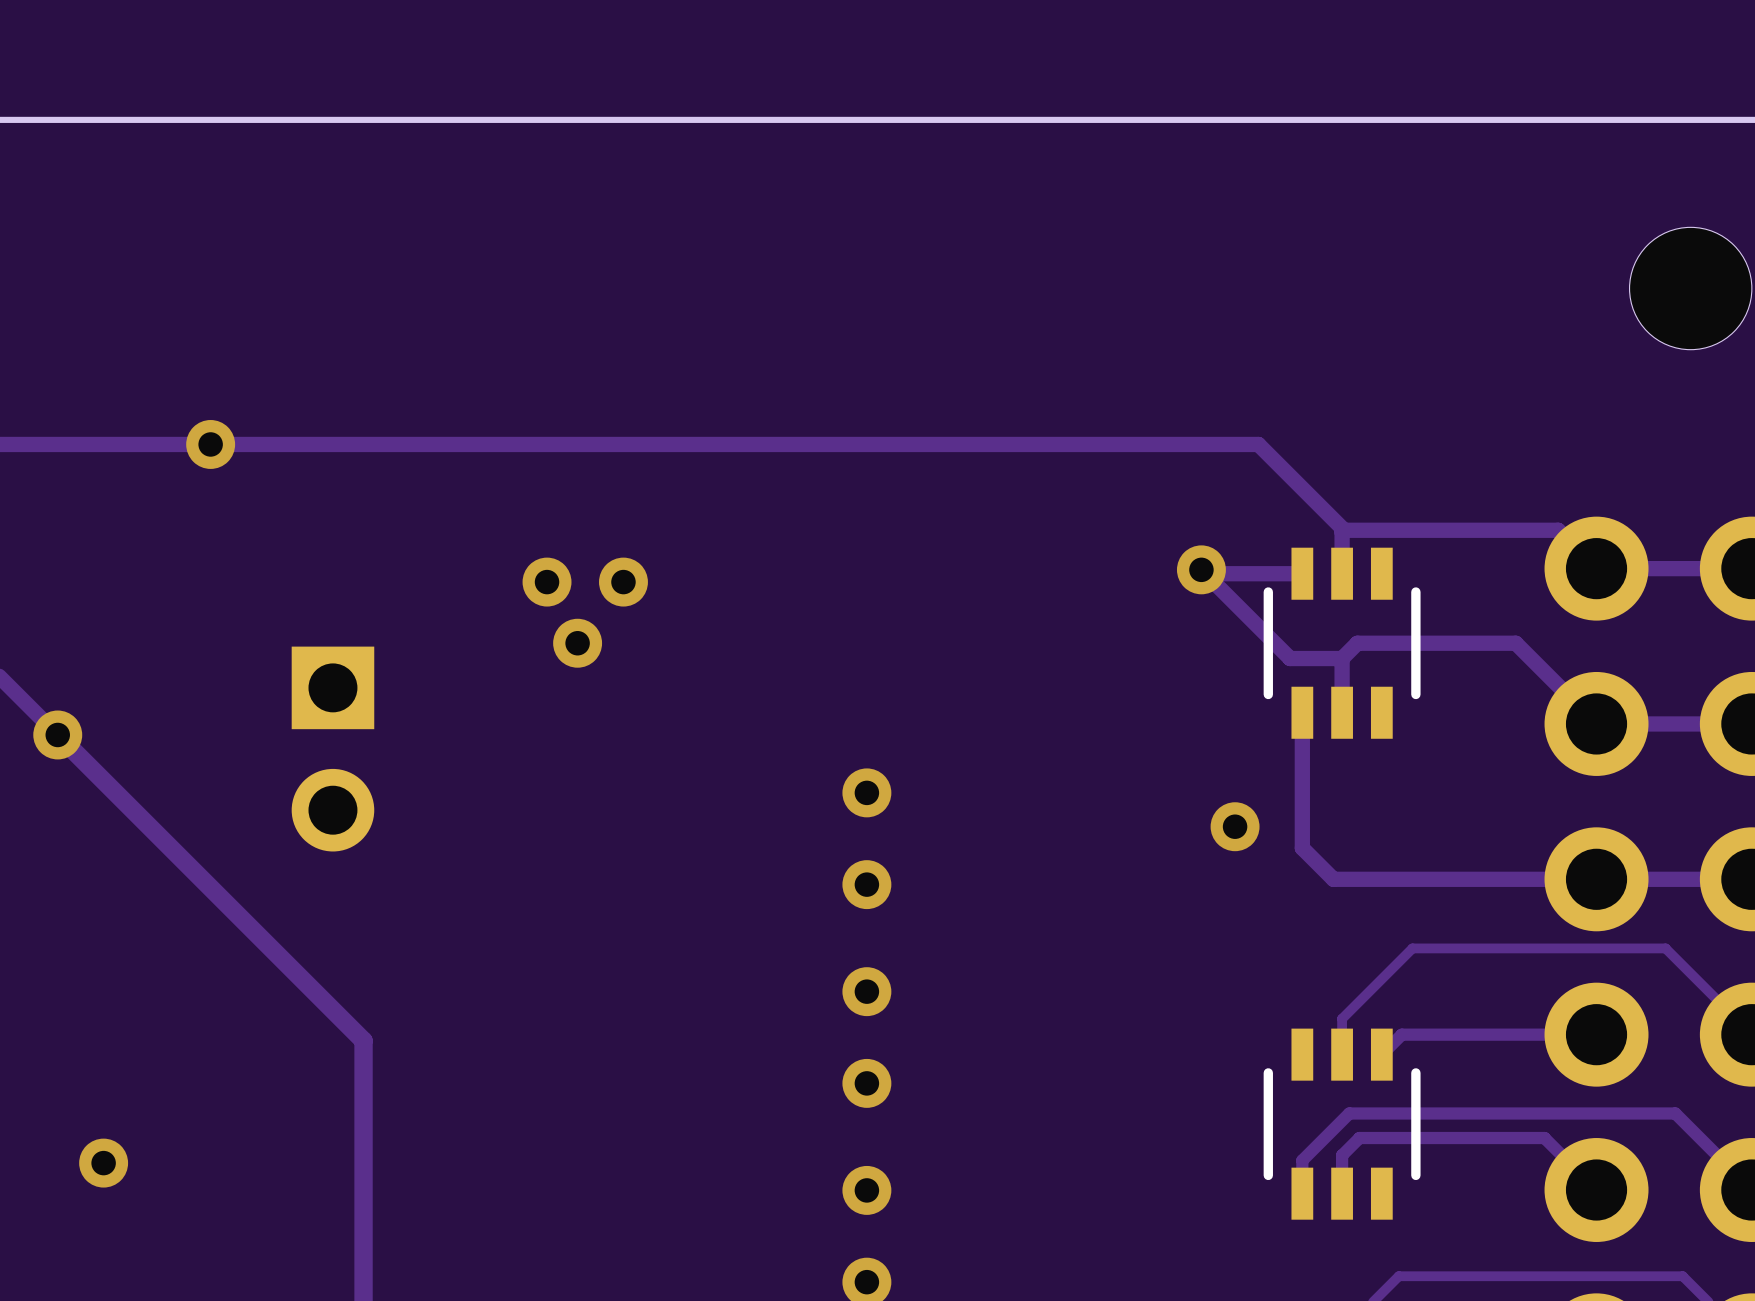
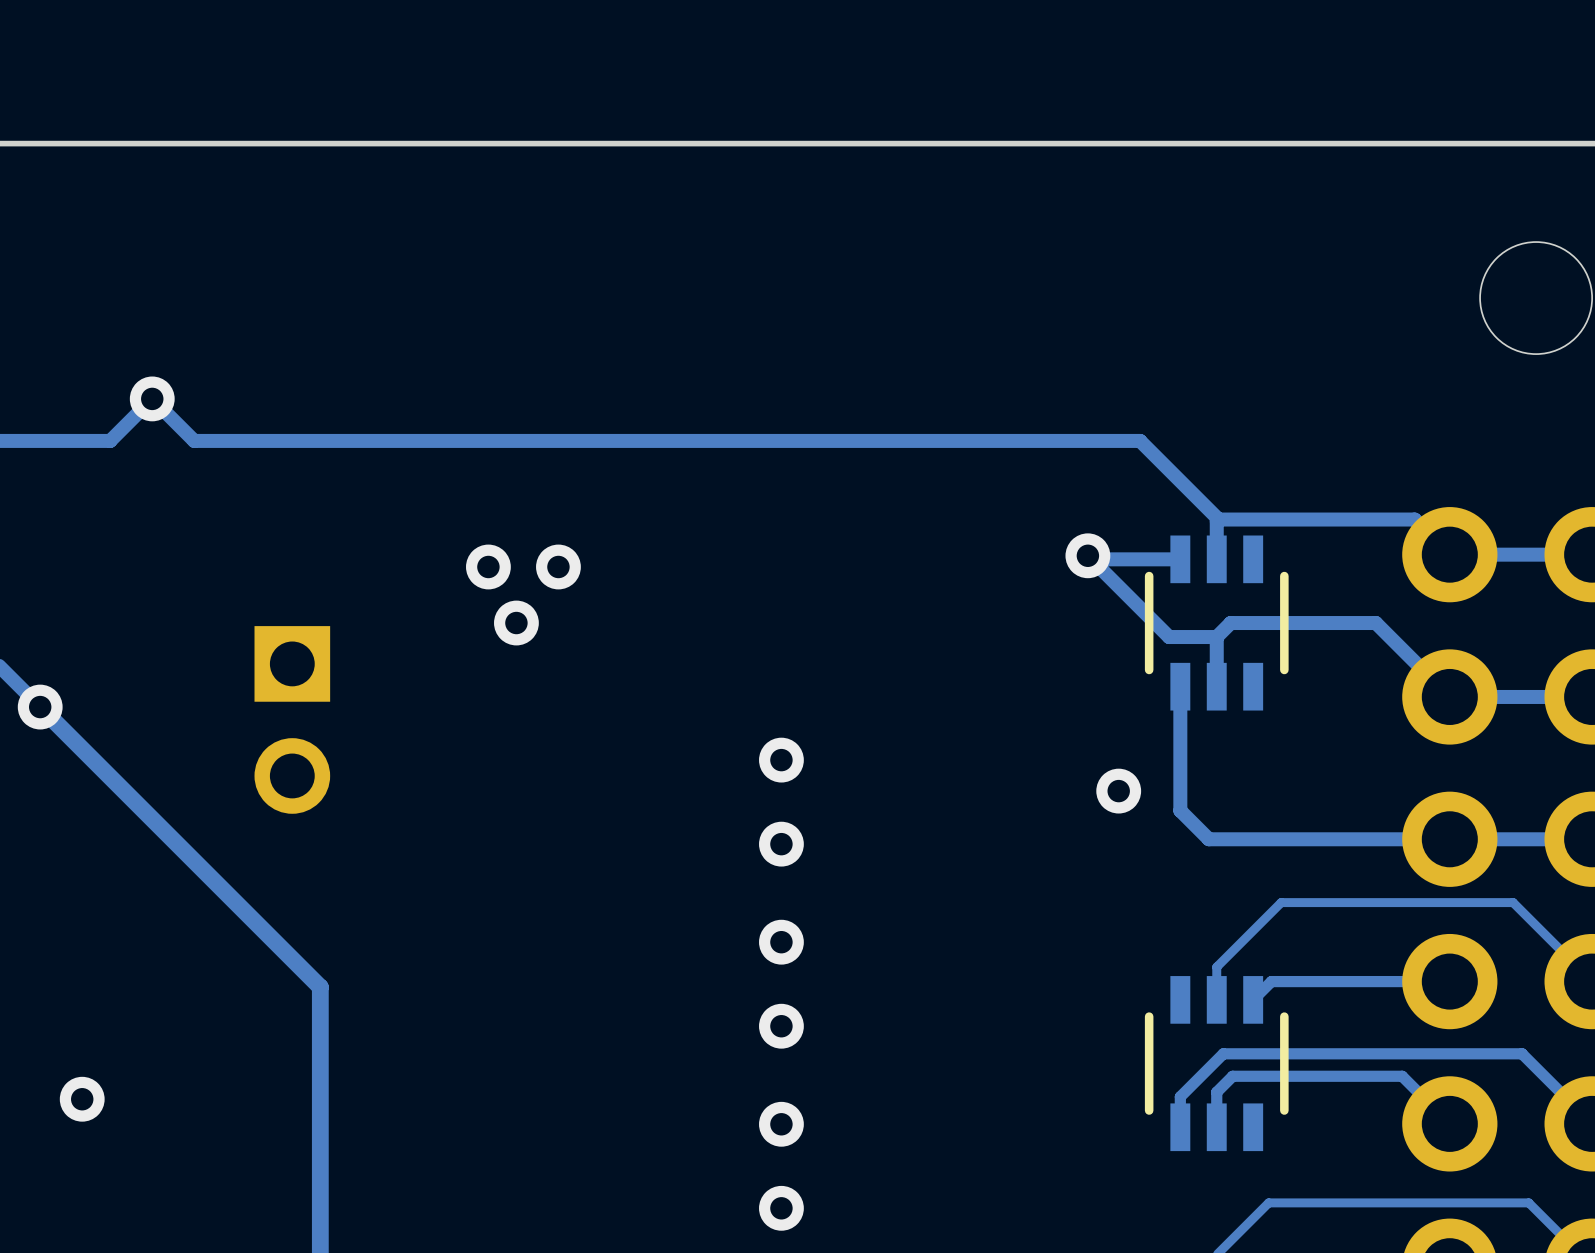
via position: (210, 444) -> (152, 398)
track: (225, 444) (134, 444) -> (194, 440) (152, 398) (110, 440)

